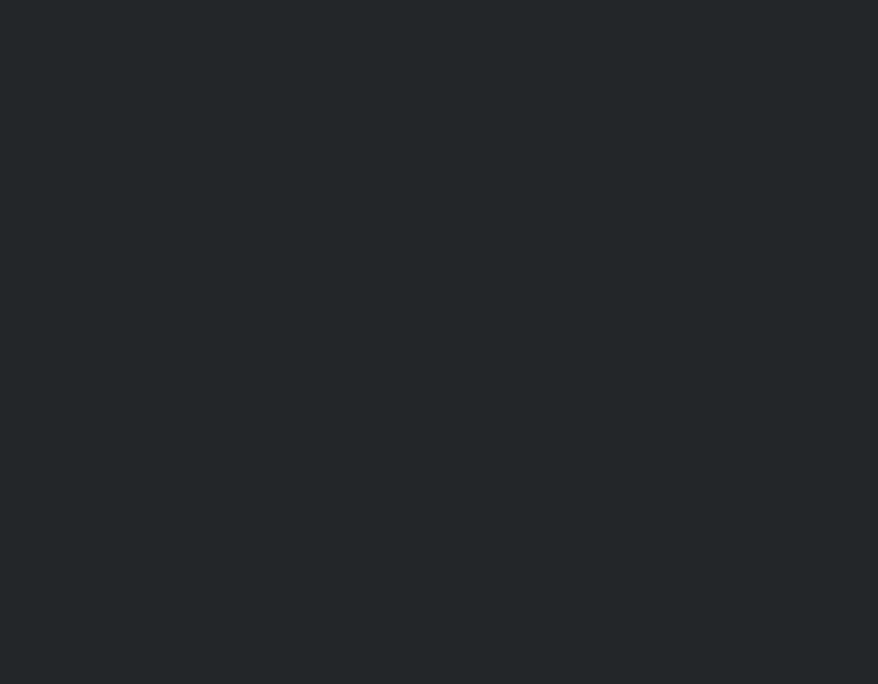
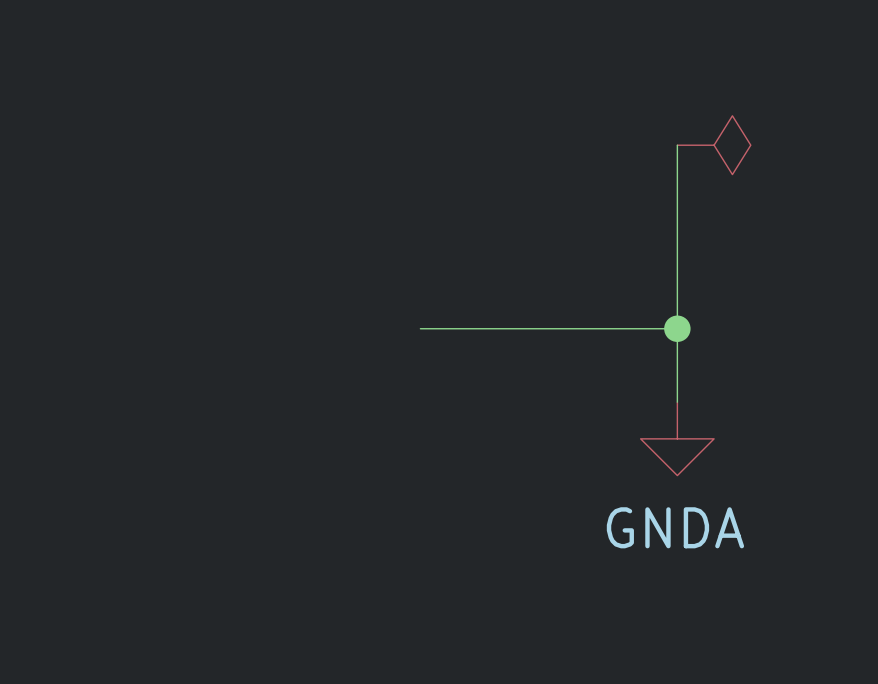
wire: none -> (677, 145) (677, 402)
power symbol: none -> (714, 145)
wire: none -> (420, 328) (677, 328)
junction: none -> (677, 328)
power symbol: none -> GNDA (677, 438)

